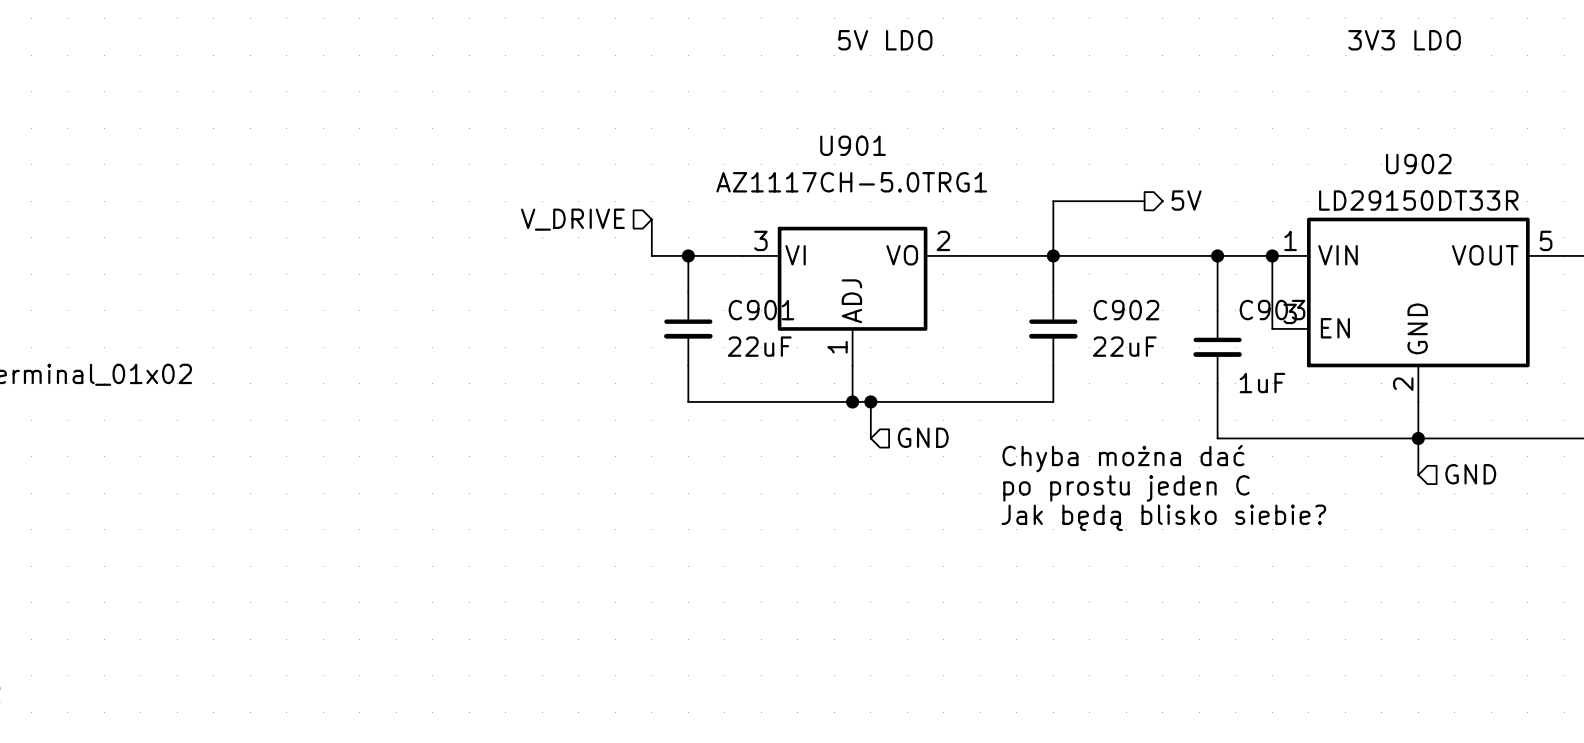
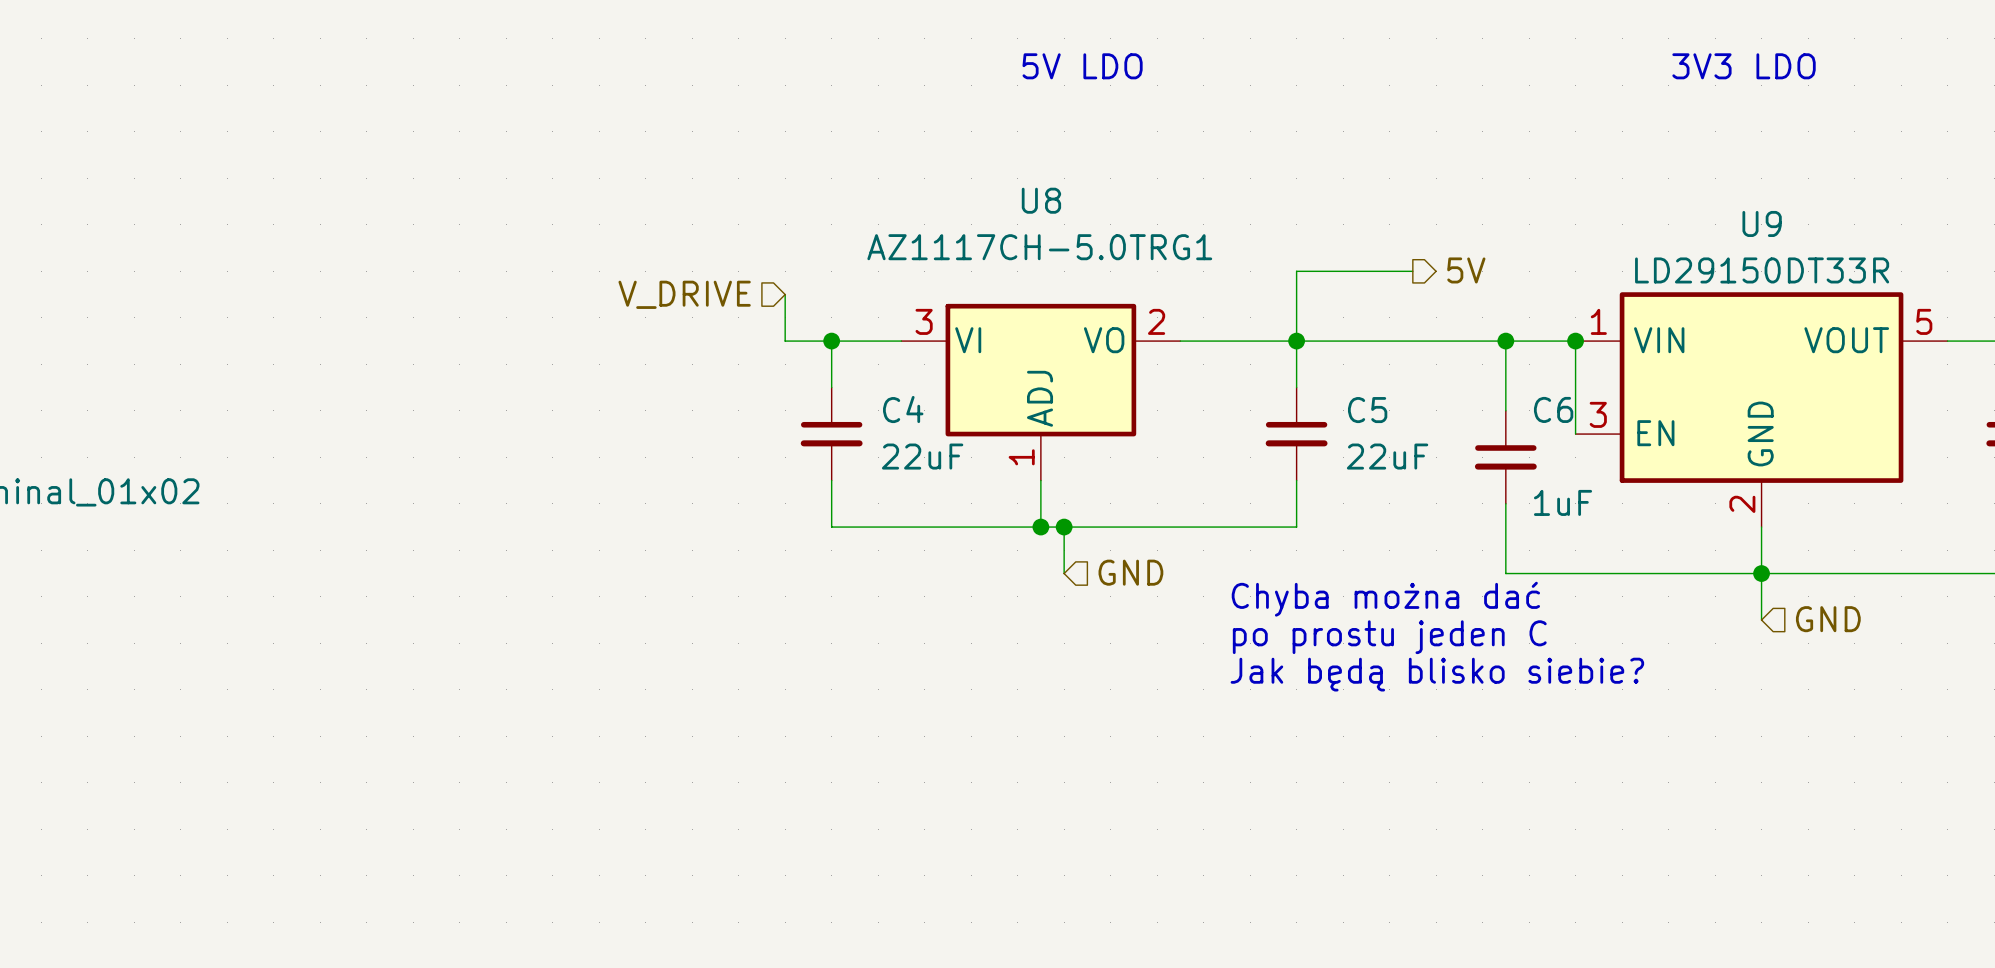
U901 name: U901 (853, 145) -> U8 (1041, 200)
U902 name: U902 (1418, 164) -> U9 (1762, 223)
C901 name: C901 (761, 310) -> C4 (903, 409)
C902 name: C902 (1126, 310) -> C5 (1367, 410)
C903 name: C903 (1272, 310) -> C6 (1553, 409)

